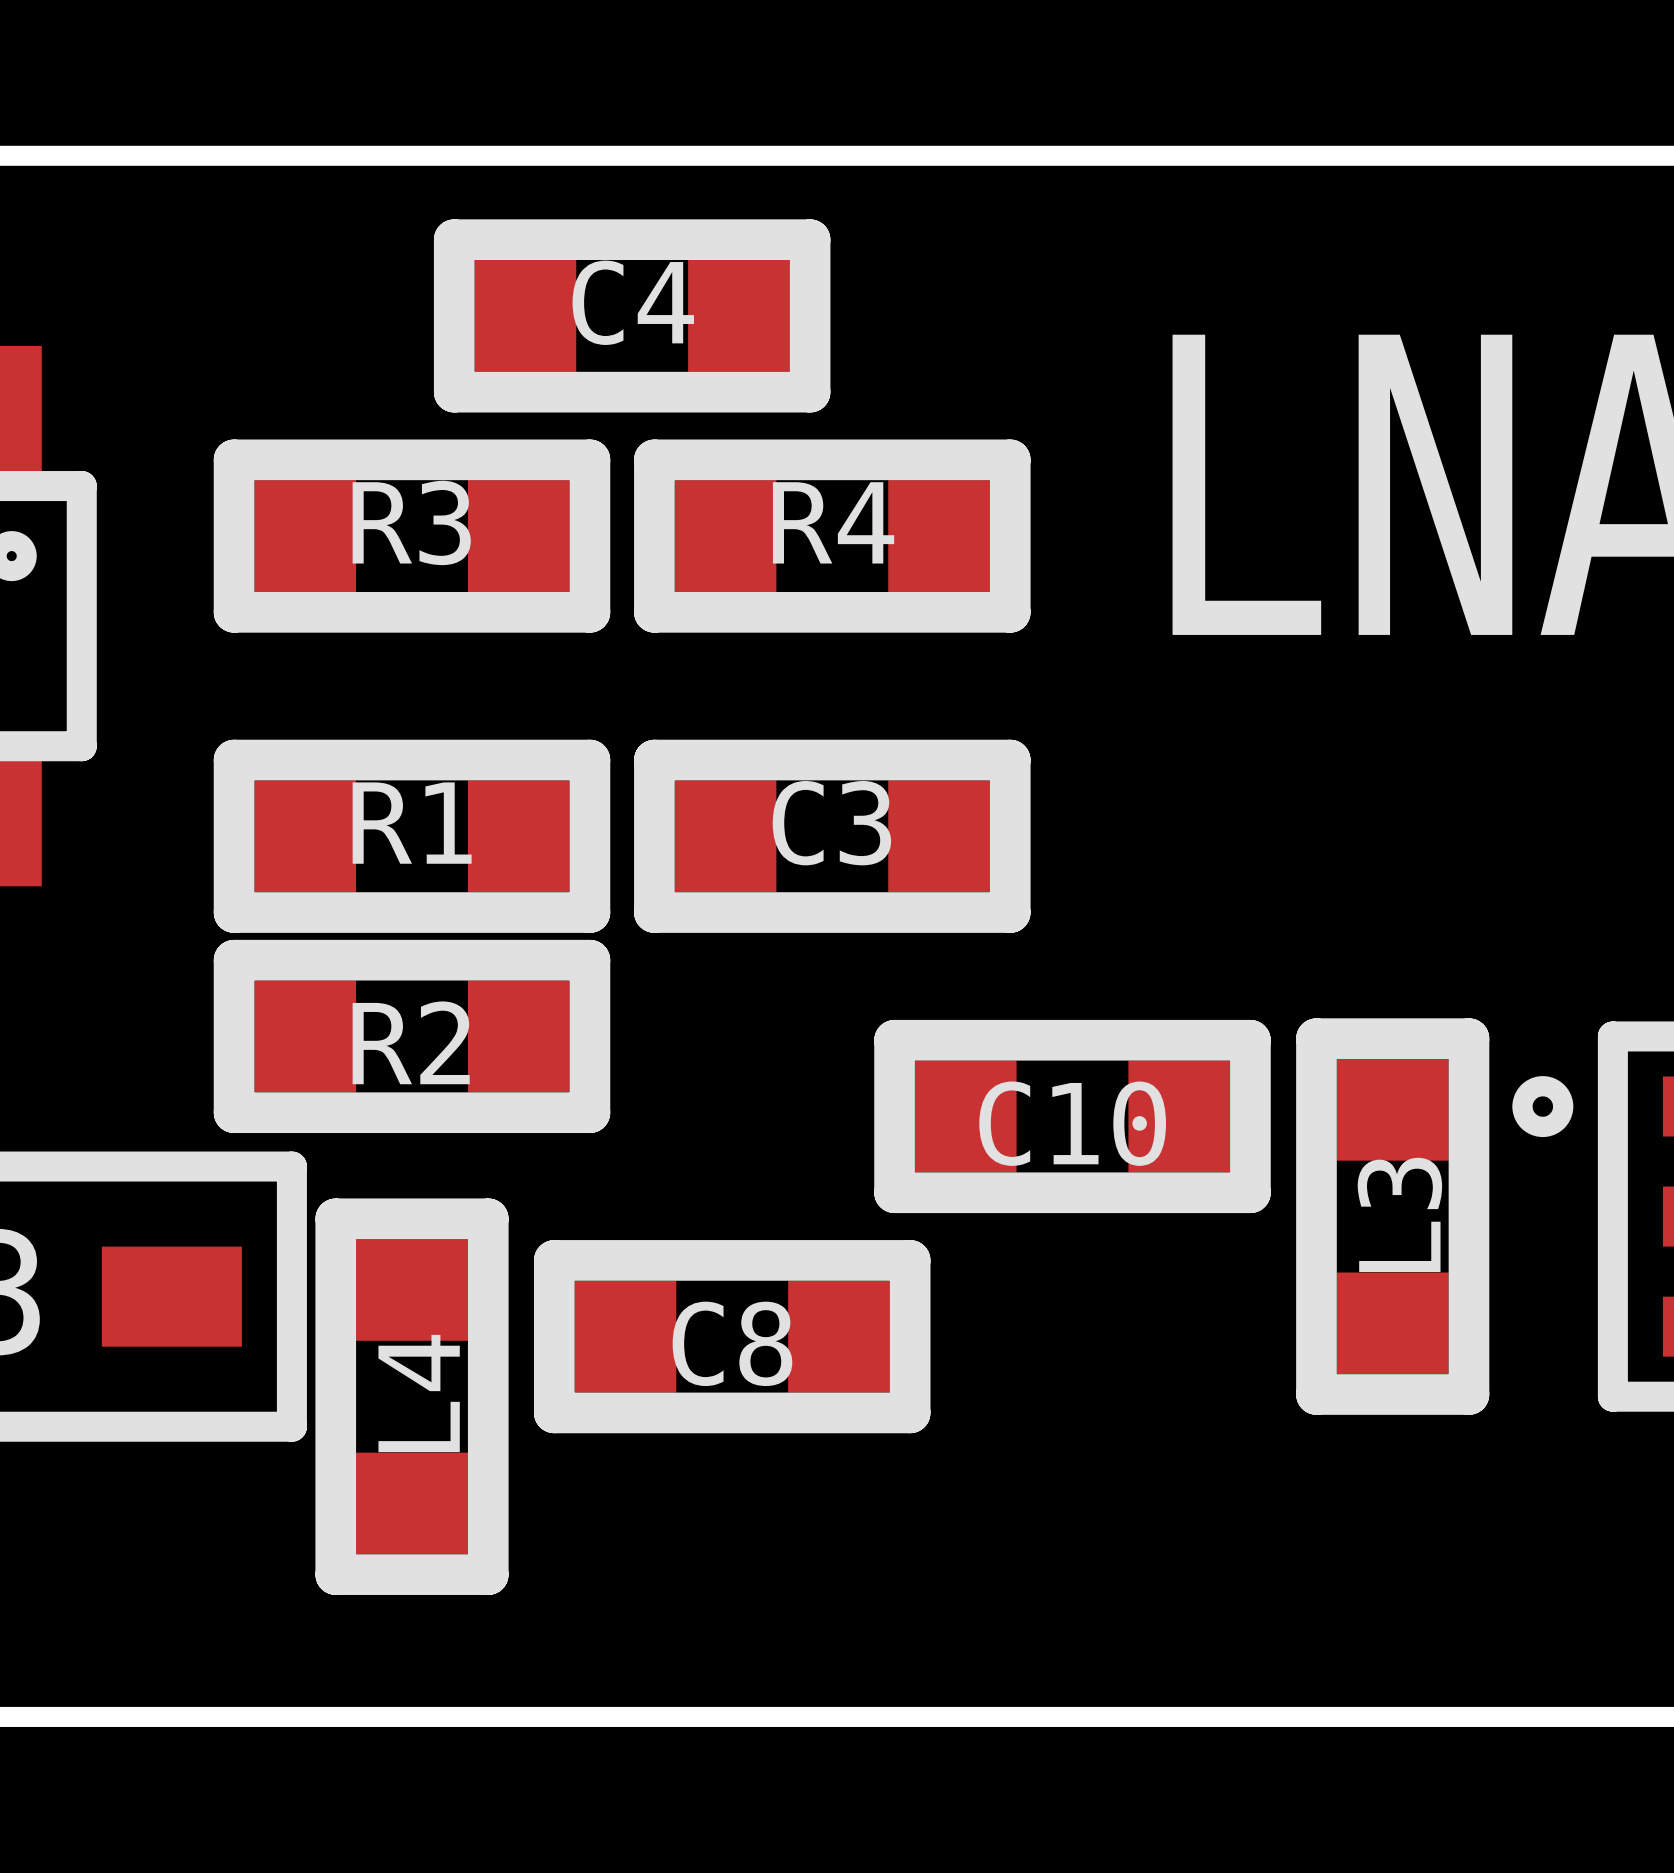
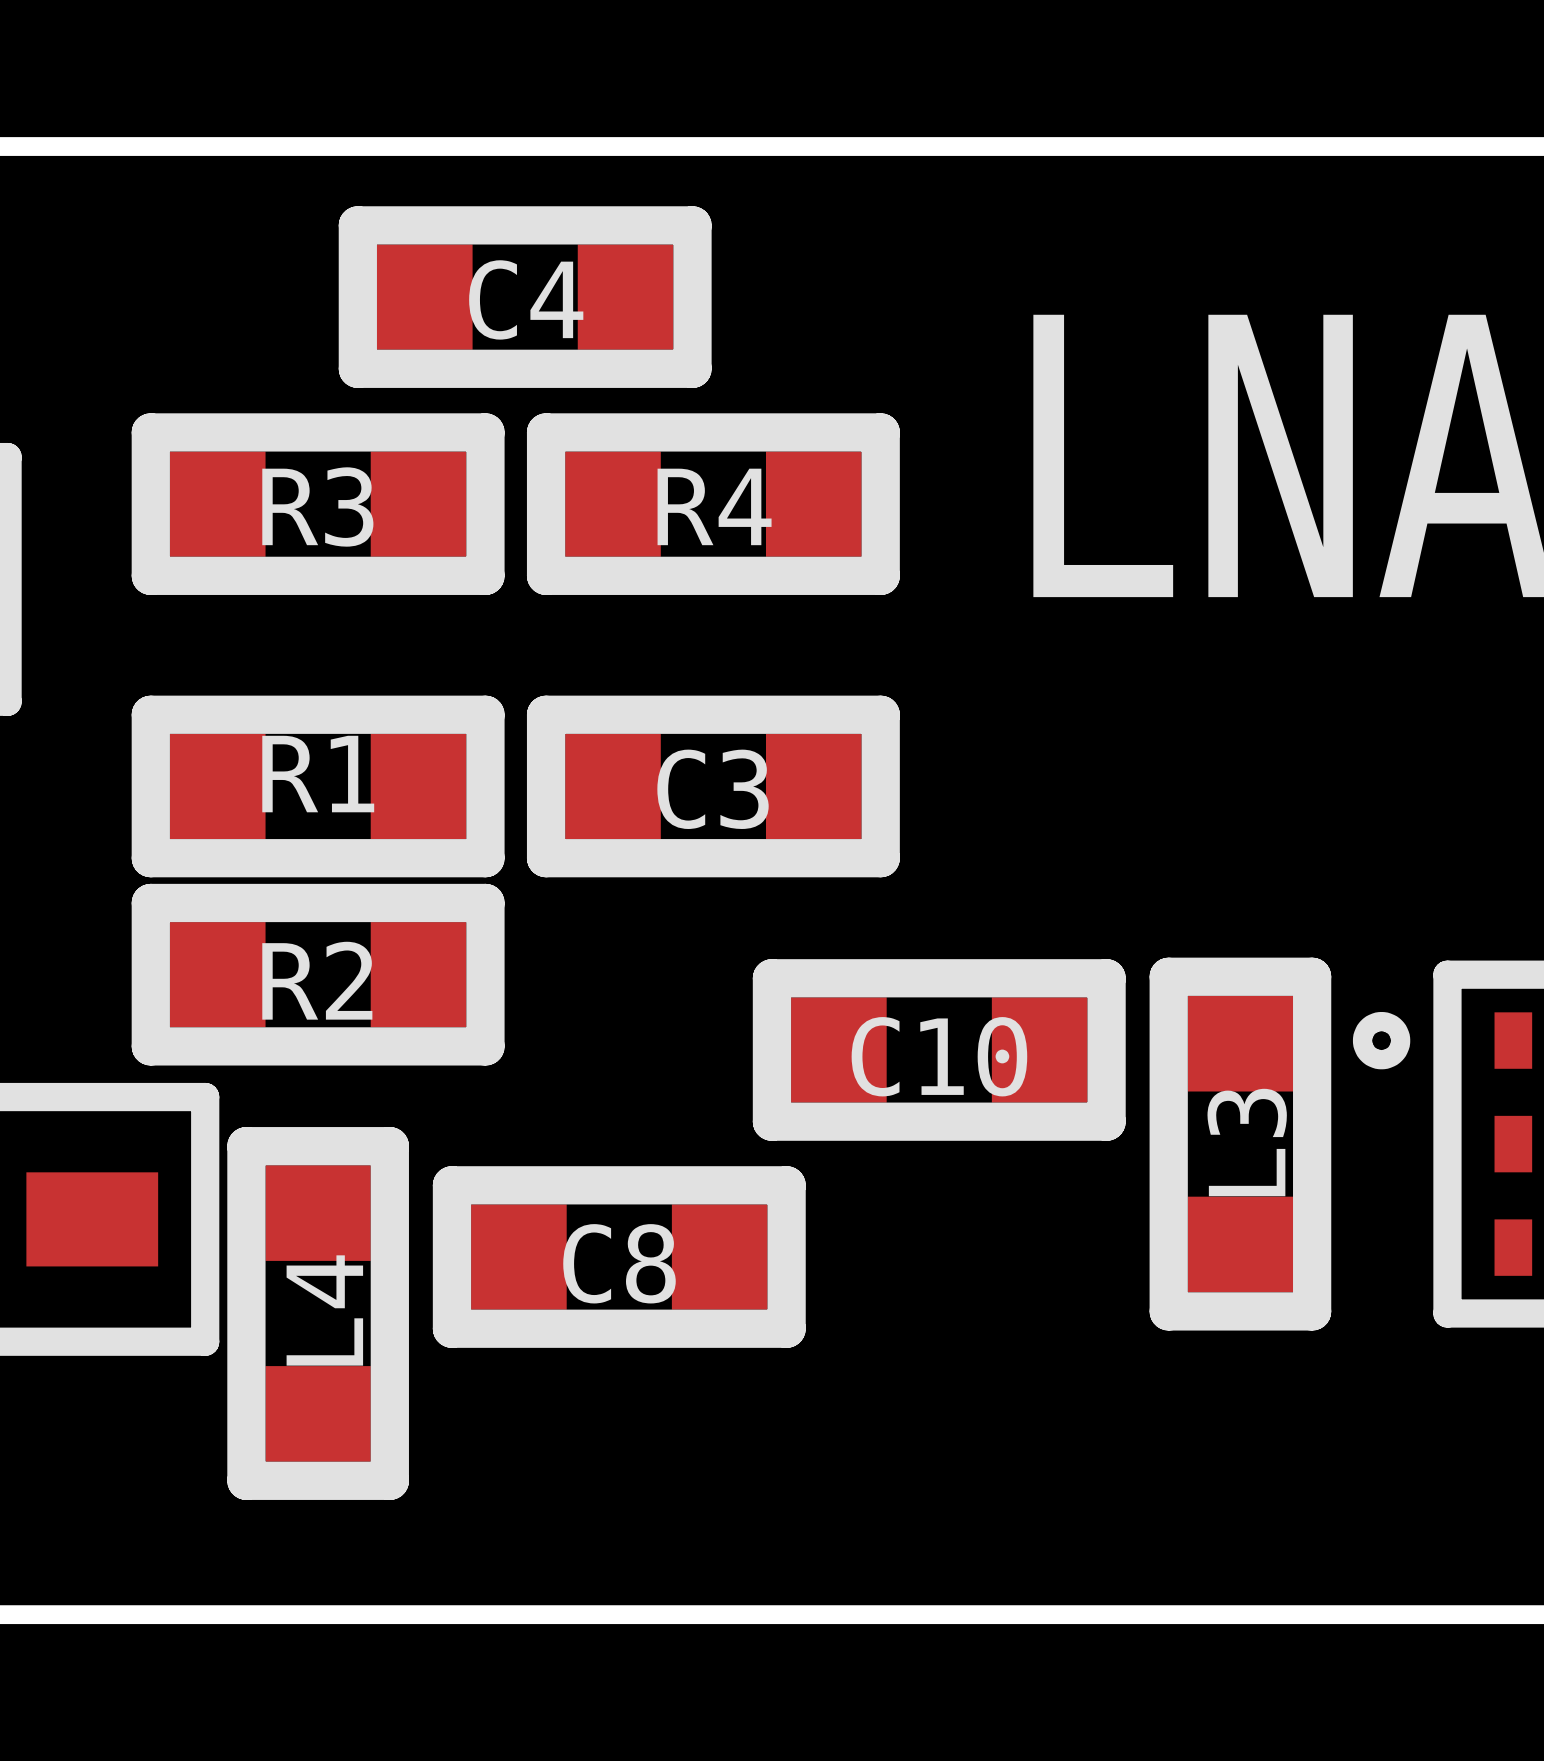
C4 name position: C4 (633, 302) -> C4 (526, 299)
R3 name position: R3 (411, 522) -> R3 (317, 506)
R4 name position: R4 (833, 522) -> R4 (714, 506)
C3 name position: C3 (831, 823) -> C3 (713, 789)

